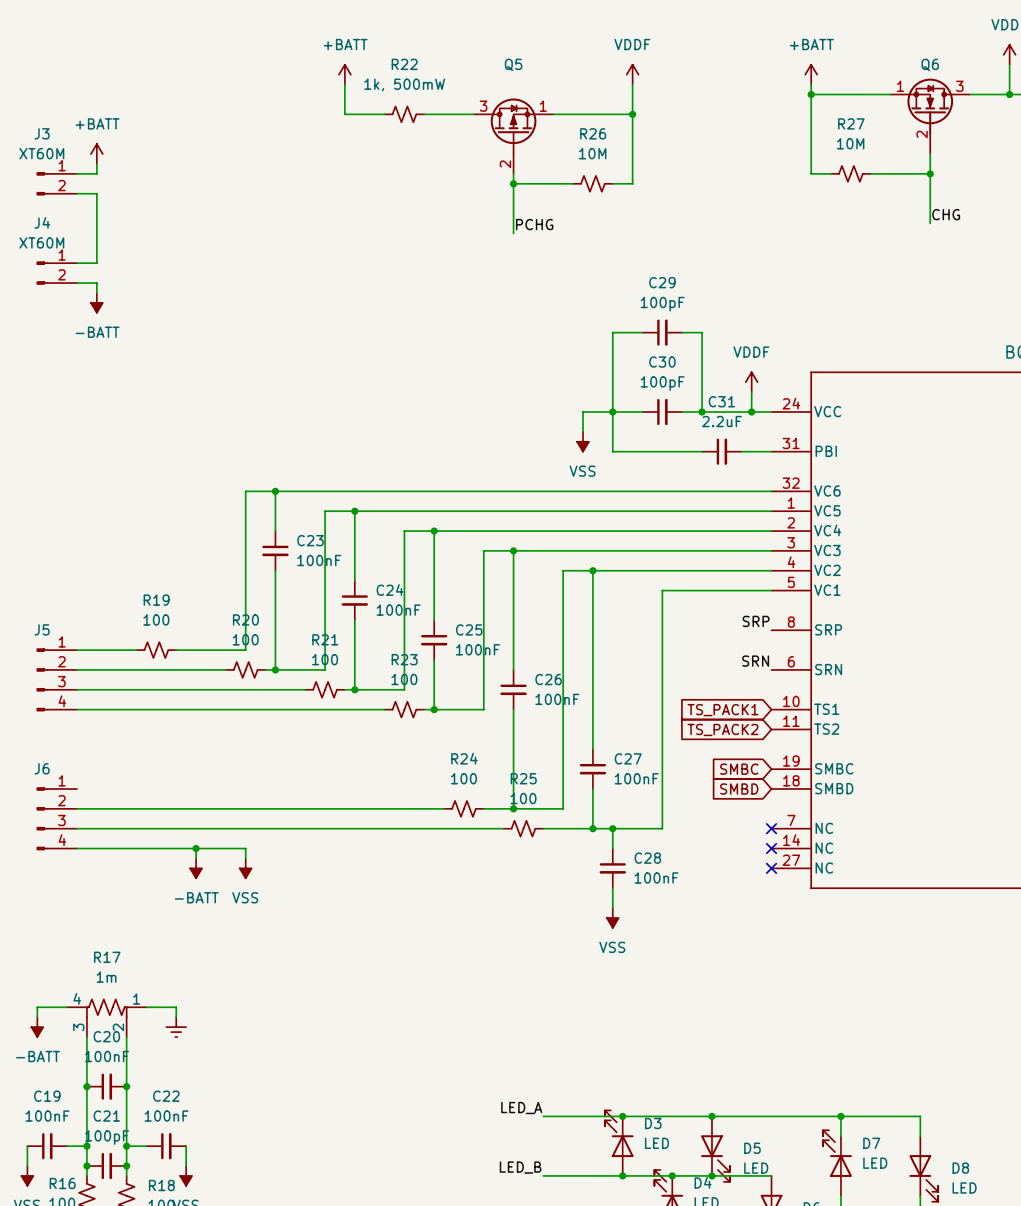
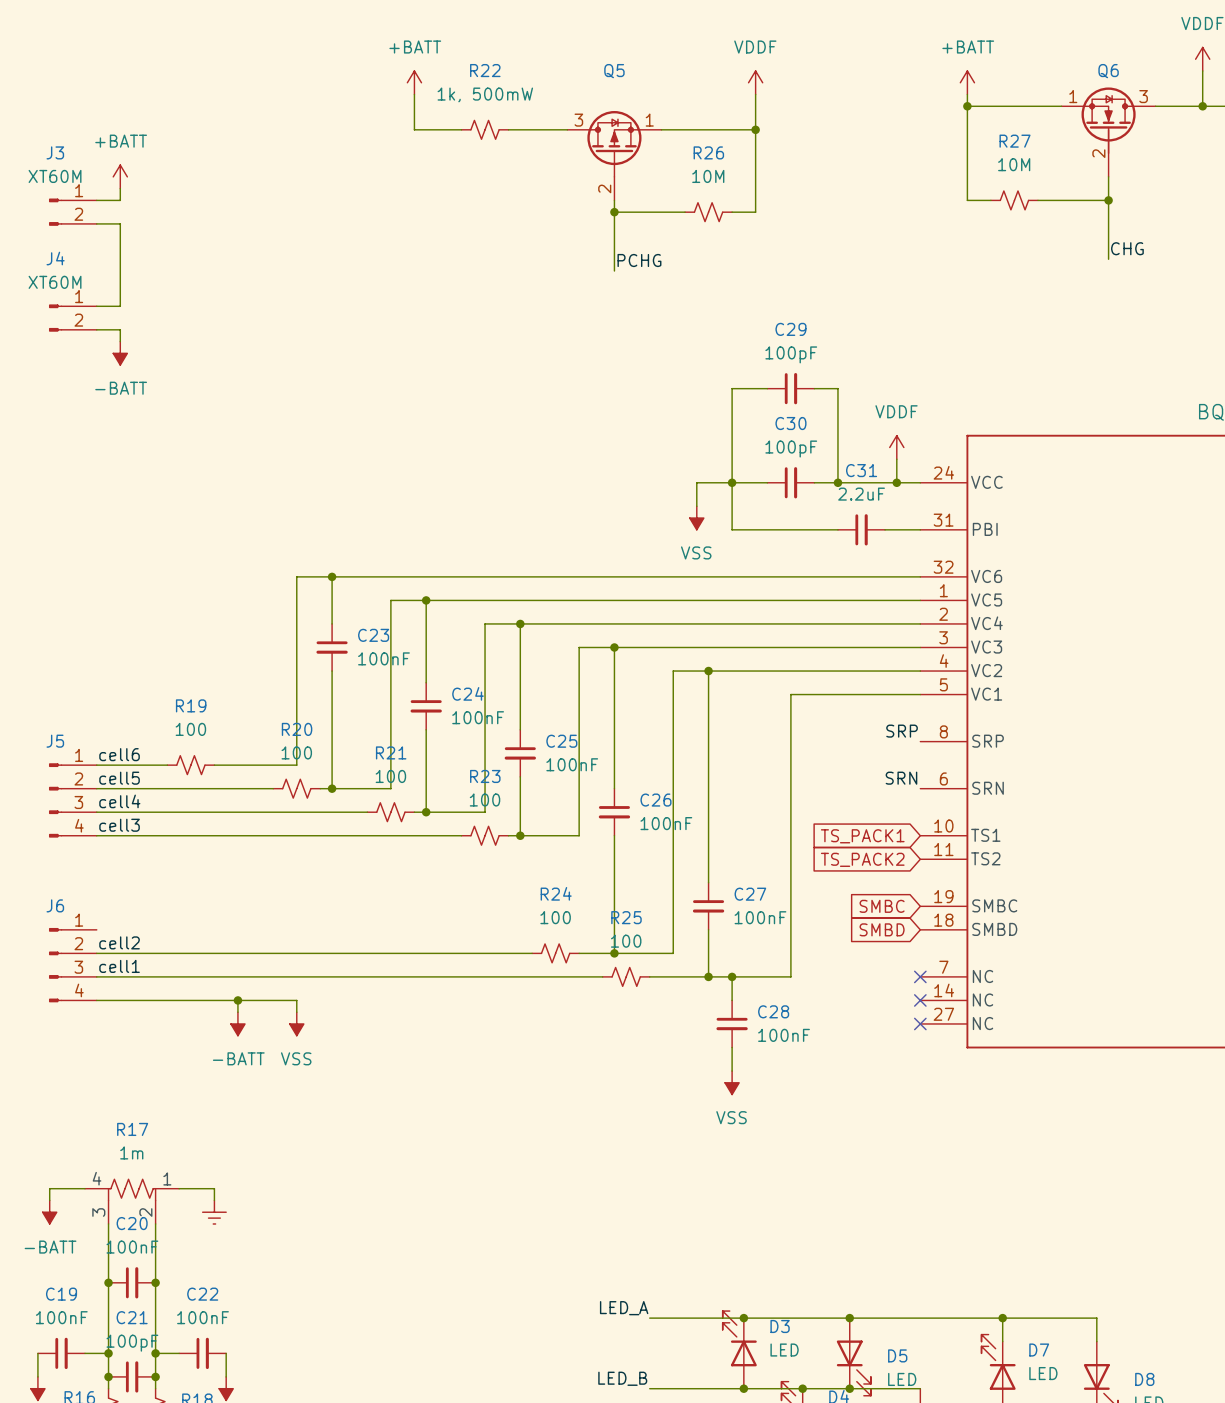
label: none -> cell6 (119, 754)
label: none -> cell5 (119, 778)
label: none -> cell4 (119, 801)
label: none -> cell3 (119, 825)
label: none -> cell2 (119, 942)
label: none -> cell1 (119, 966)

